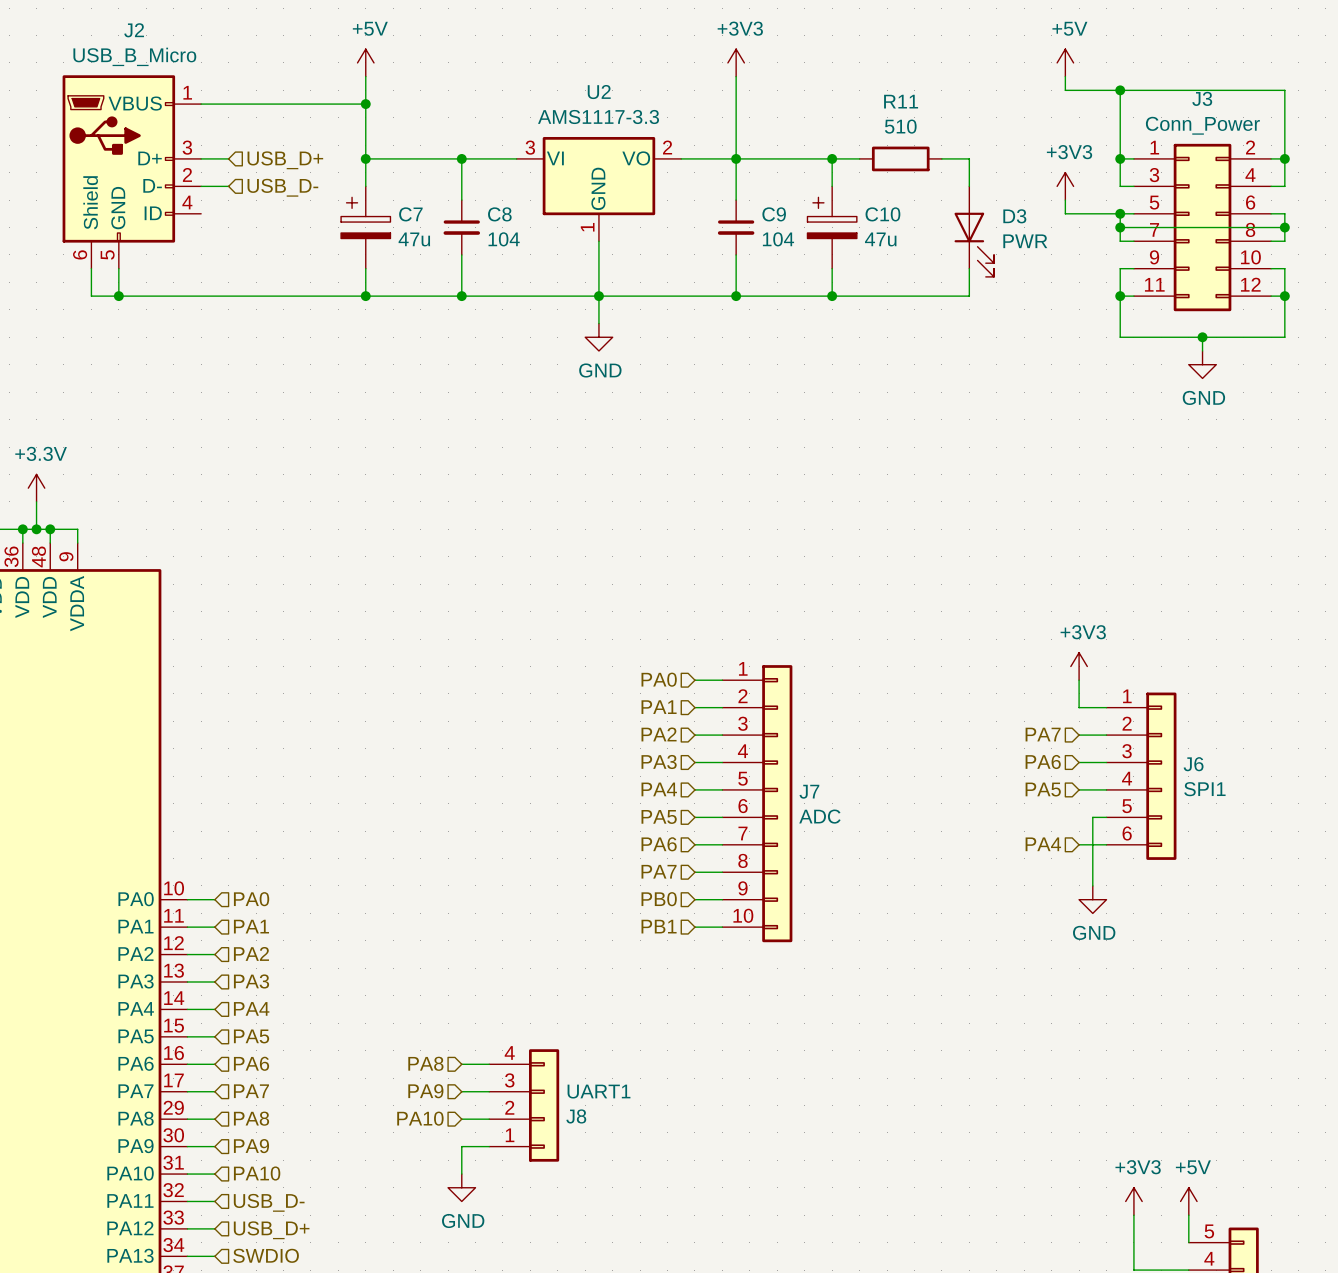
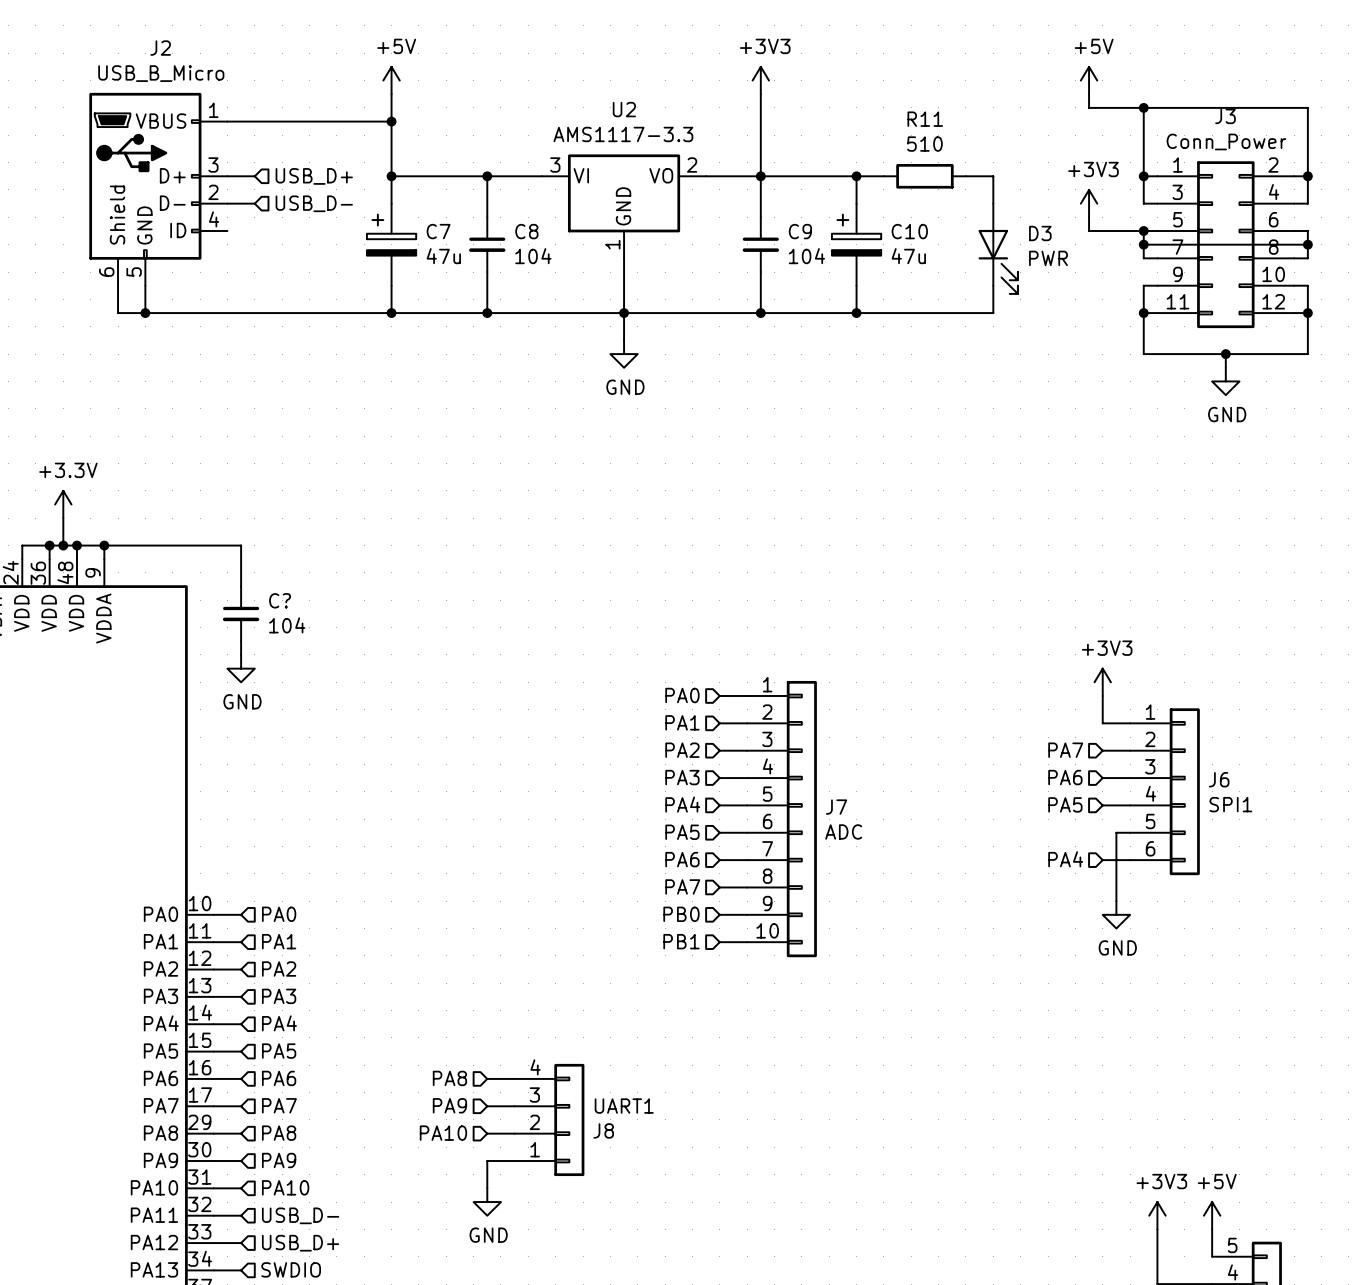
wire: none -> (104, 545) (241, 545) (241, 586)
junction: none -> (104, 545)
C?: none -> 104 (241, 613)
wire: none -> (241, 641) (241, 654)
power symbol: none -> GND (241, 668)

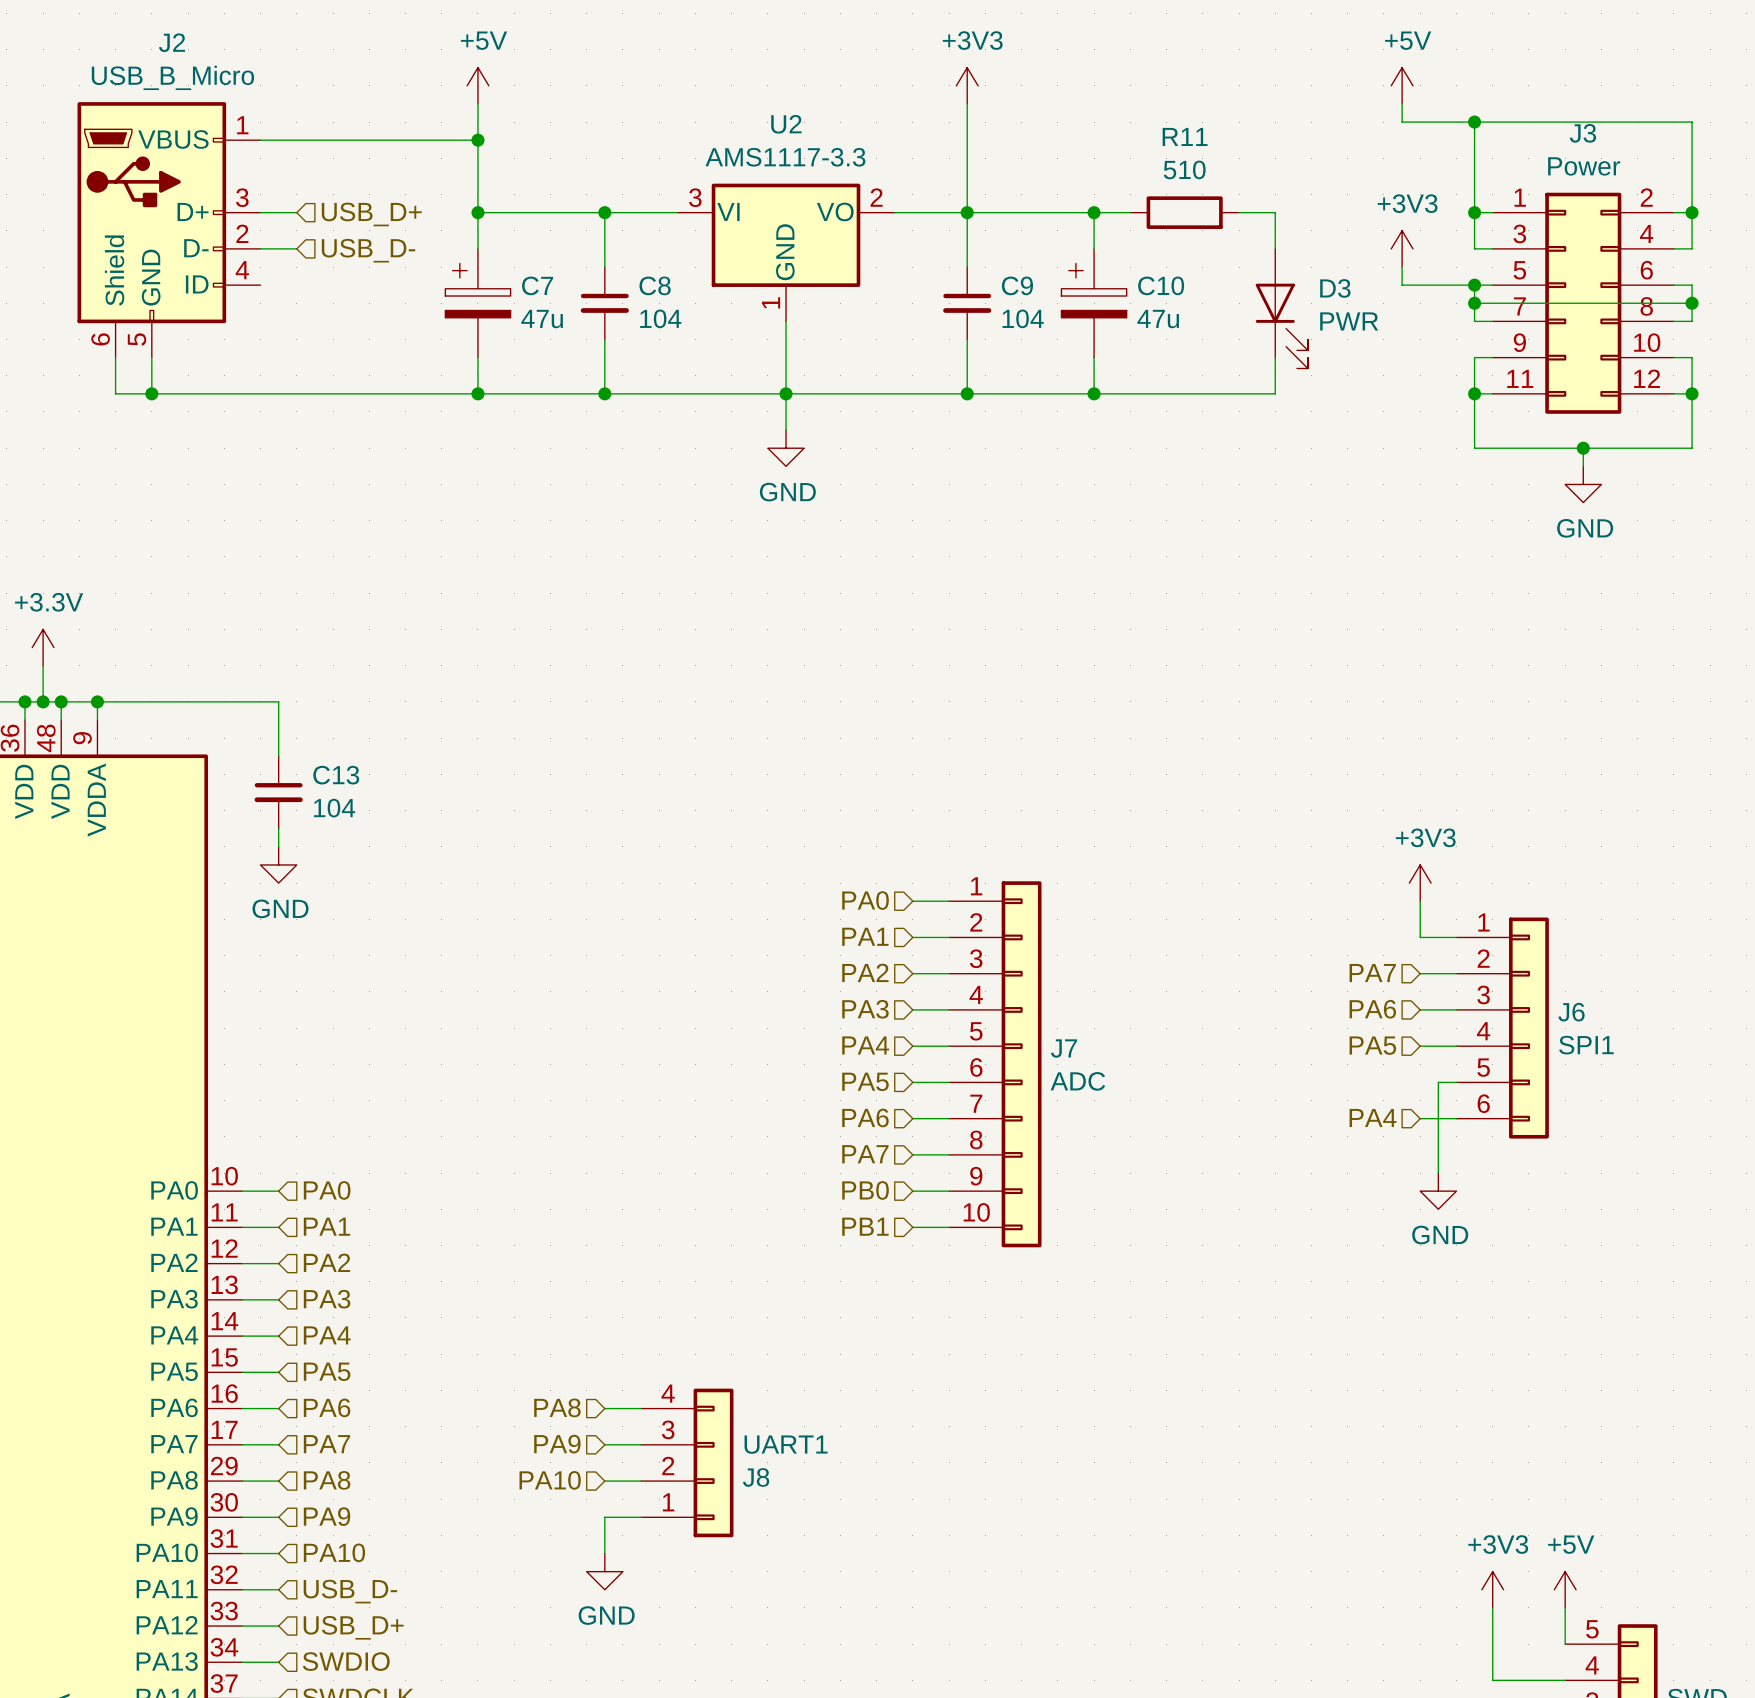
J3 value: Conn_Power (1226, 141) -> Power (1584, 166)
C? name: C? (280, 600) -> C13 (336, 775)

